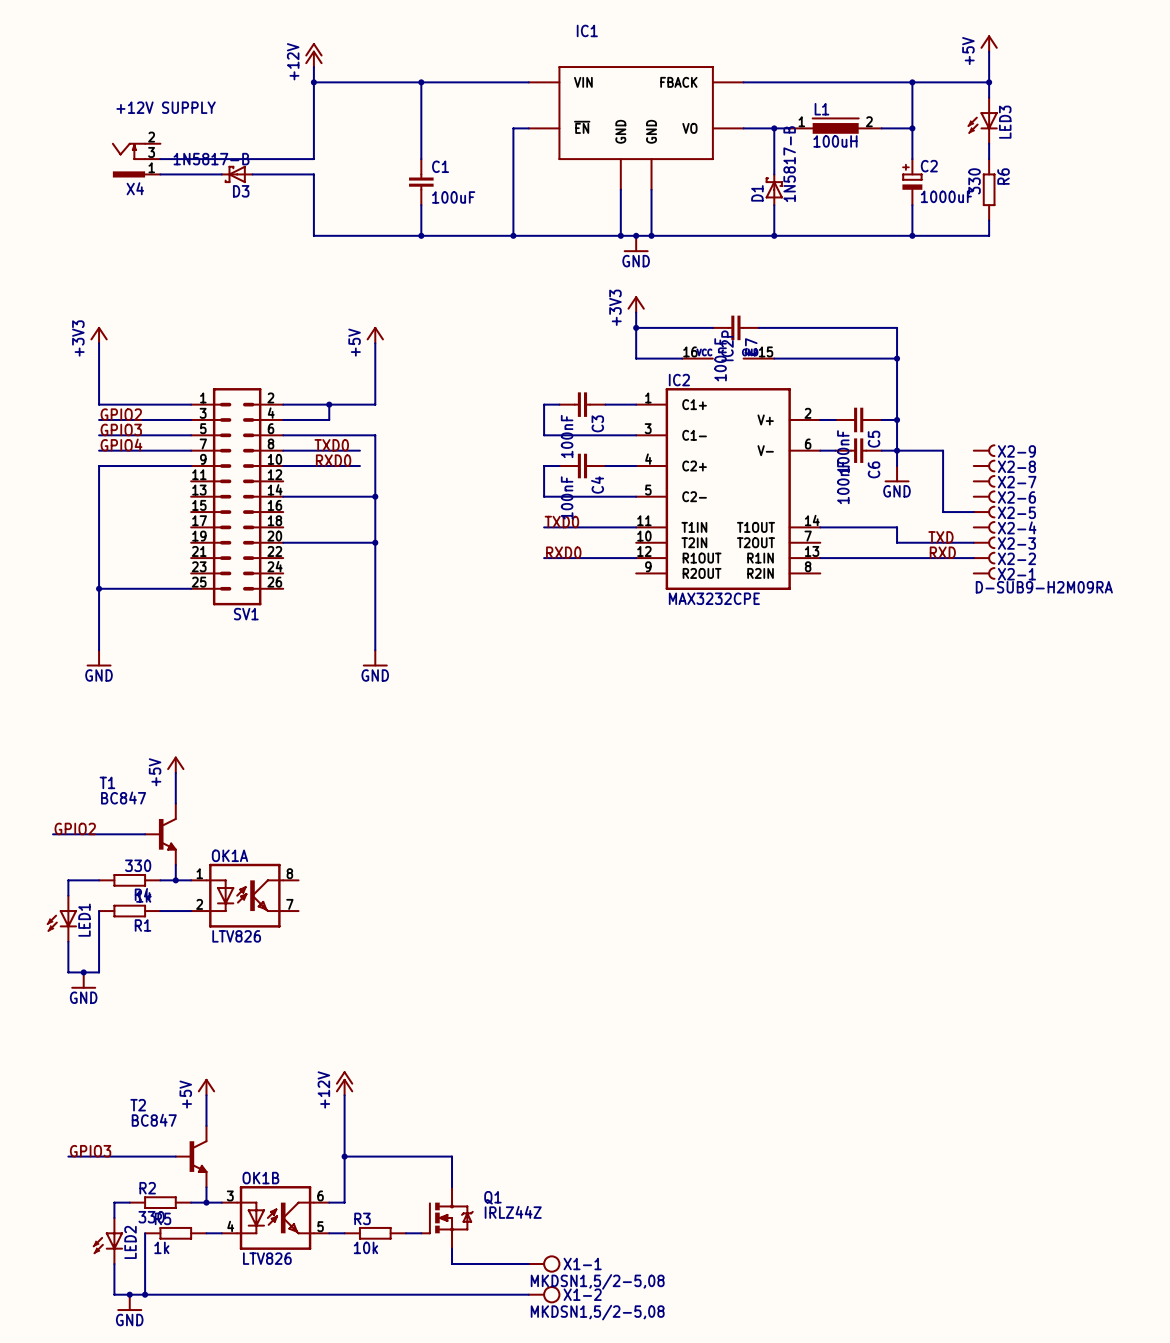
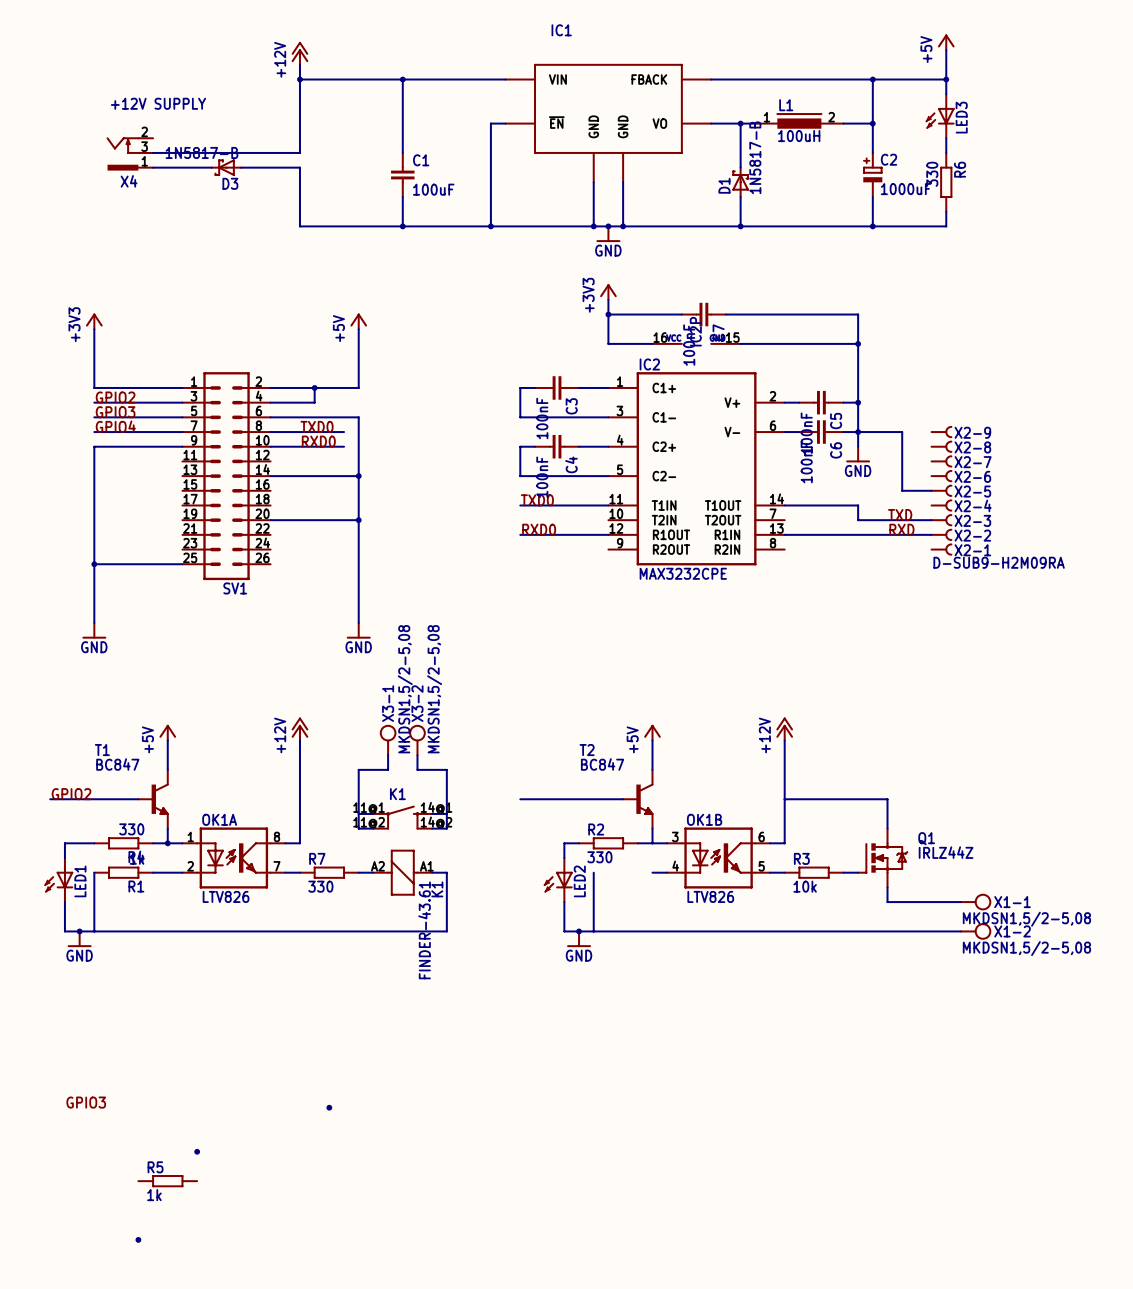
power symbol: none -> +12V (299, 729)
power symbol: none -> +12V (784, 729)
power symbol: none -> +5V (652, 732)
wire: none -> (299, 740) (299, 843) (285, 843)
X3-1: none -> MKDSN1,5/2-5,08 (388, 740)
X3-2: none -> MKDSN1,5/2-5,08 (417, 740)
wire: none -> (652, 740) (652, 769)
wire: none -> (784, 740) (784, 843) (770, 843)
wire: none -> (388, 755) (388, 769) (358, 769) (358, 828) (373, 828)
wire: none -> (417, 755) (417, 769) (446, 769) (446, 828) (432, 828)
wire: none -> (520, 799) (623, 799)
wire: none -> (784, 799) (887, 799) (887, 828)
wire: none -> (358, 813) (373, 813)
wire: none -> (432, 813) (446, 813)
K1: none -> (402, 817)
wire: none -> (652, 828) (652, 843)
wire: none -> (579, 843) (564, 843) (564, 858)
wire: none -> (637, 843) (667, 843)
wire: none -> (285, 872) (299, 872)
R7: none -> 330 (329, 872)
wire: none -> (358, 872) (373, 872)
K1: none -> FINDER-43.61 (402, 872)
wire: none -> (432, 872) (446, 872) (446, 931) (94, 931)
wire: none -> (593, 872) (593, 931)
wire: none -> (652, 872) (667, 872)
wire: none -> (770, 872) (784, 872)
wire: none -> (843, 872) (858, 872)
wire: none -> (887, 887) (887, 902) (960, 902)
wire: none -> (564, 902) (564, 931) (960, 931)
junction: none -> (579, 931)
power symbol: none -> GND (579, 939)
power symbol: +12V (344, 1083) -> none
power symbol: +5V (206, 1087) -> none
wire: (206, 1095) (206, 1125) -> none
wire: (344, 1095) (344, 1202) (329, 1202) -> none
wire: (68, 1156) (175, 1156) -> none
T2 position: (191, 1156) -> (638, 799)
wire: (344, 1156) (452, 1156) (452, 1187) -> none
wire: (206, 1187) (206, 1202) -> none
wire: (129, 1202) (114, 1202) (114, 1217) -> none
R2 position: (160, 1202) -> (608, 843)
wire: (191, 1202) (221, 1202) -> none
OK1B position: (275, 1217) -> (718, 858)
Q1 position: (447, 1217) -> (882, 858)
wire: (145, 1233) (145, 1294) -> none
wire: (206, 1233) (221, 1233) -> none
wire: (329, 1233) (344, 1233) -> none
R3 position: (375, 1233) -> (814, 872)
wire: (405, 1233) (421, 1233) -> none
LED2 position: (108, 1240) -> (558, 880)
wire: (452, 1248) (452, 1264) (528, 1264) -> none
wire: (114, 1264) (114, 1294) (528, 1294) -> none
X1-1 position: (544, 1264) -> (976, 902)
junction: (129, 1294) -> none
X1-2 position: (544, 1294) -> (976, 931)
power symbol: GND (129, 1302) -> none

